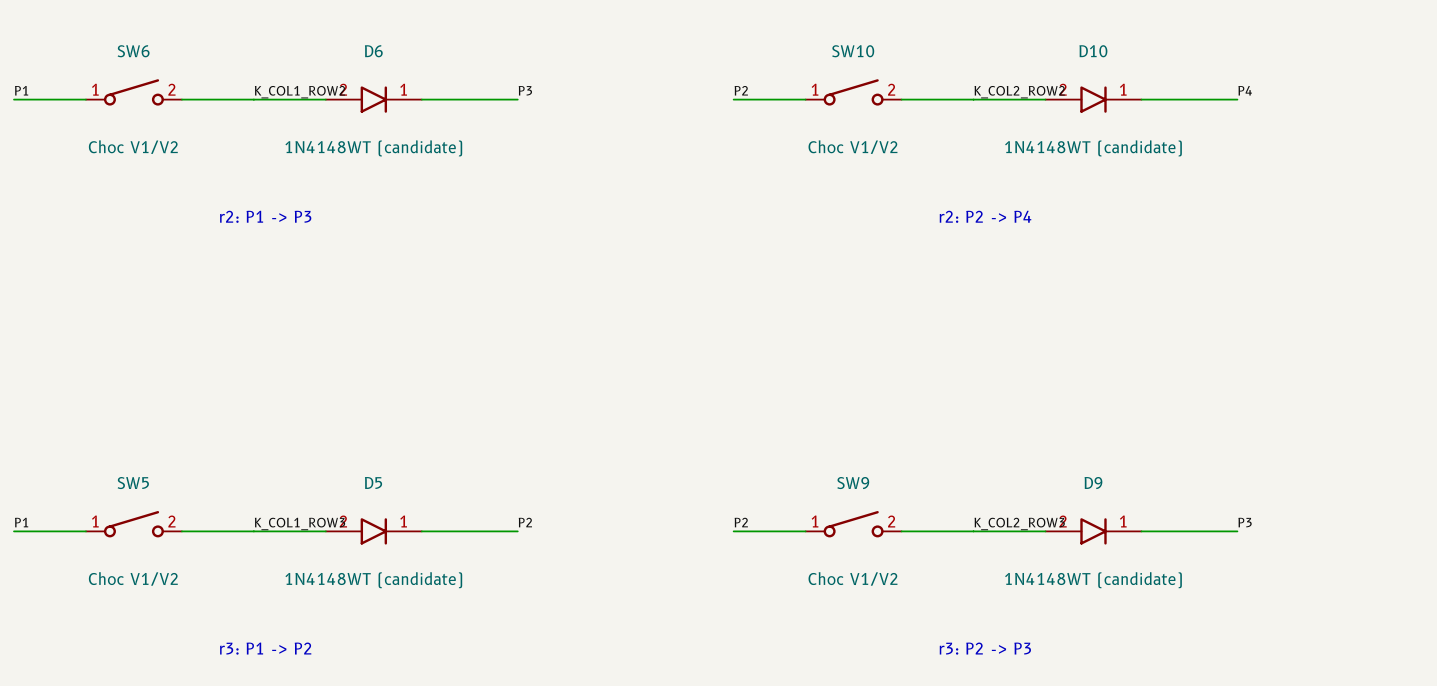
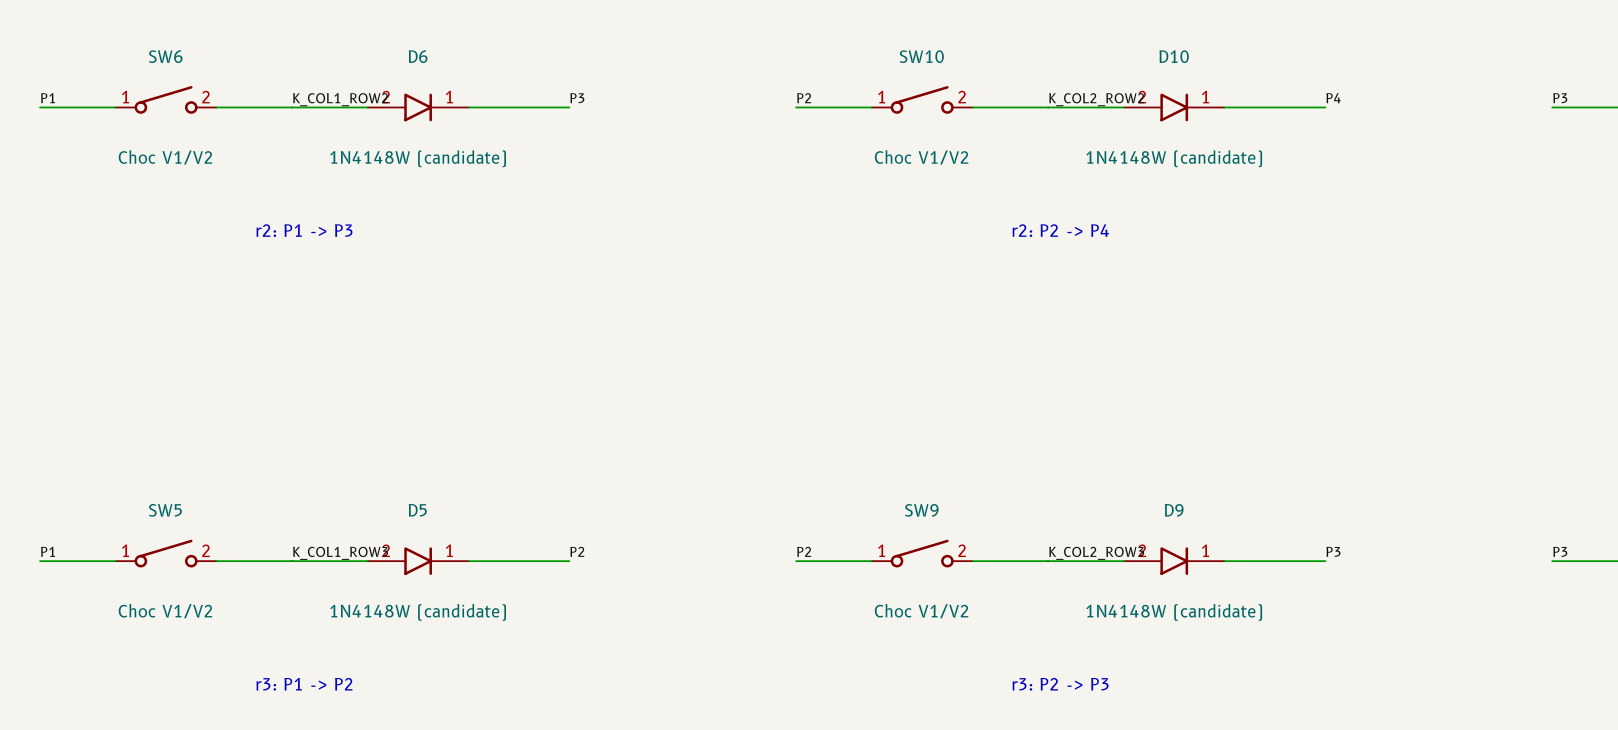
D6 value: 1N4148WT (candidate) (373, 148) -> 1N4148W (candidate) (418, 158)
D10 value: 1N4148WT (candidate) (1093, 148) -> 1N4148W (candidate) (1174, 158)
D5 value: 1N4148WT (candidate) (373, 580) -> 1N4148W (candidate) (418, 612)
D9 value: 1N4148WT (candidate) (1093, 580) -> 1N4148W (candidate) (1174, 612)

